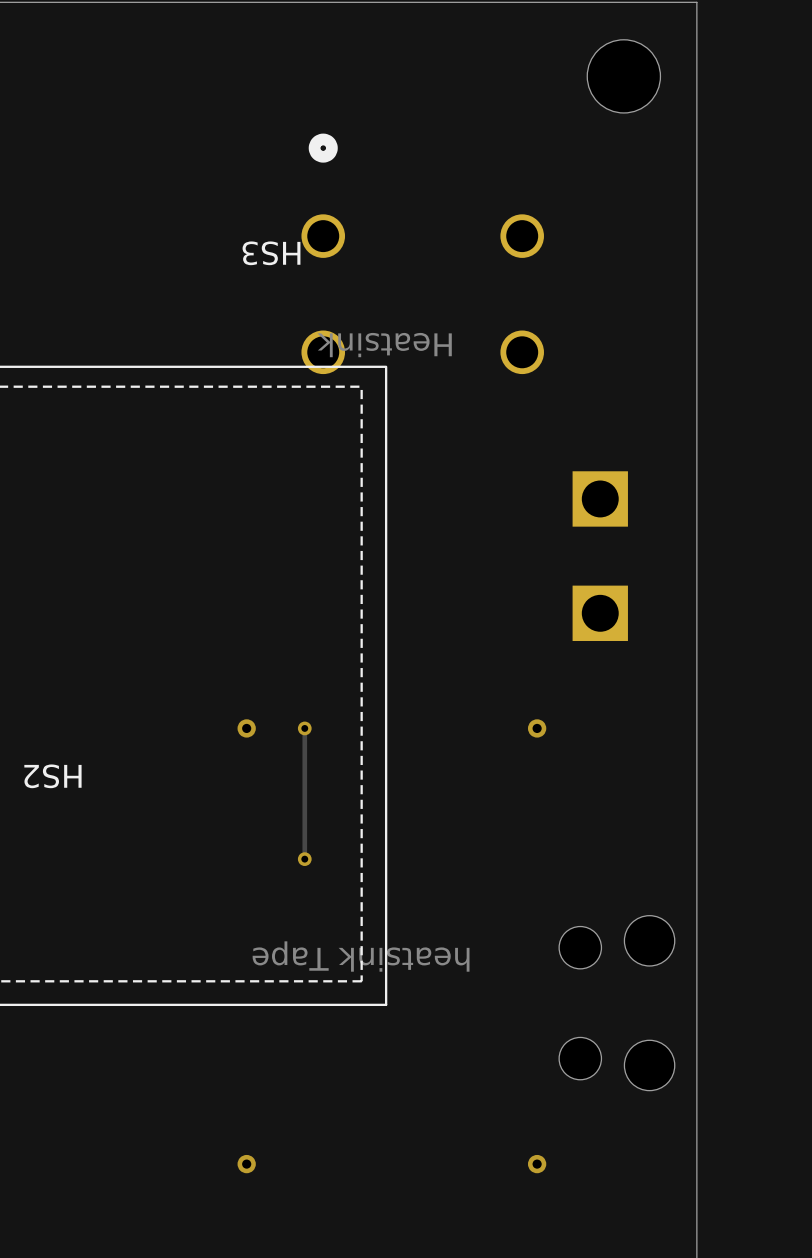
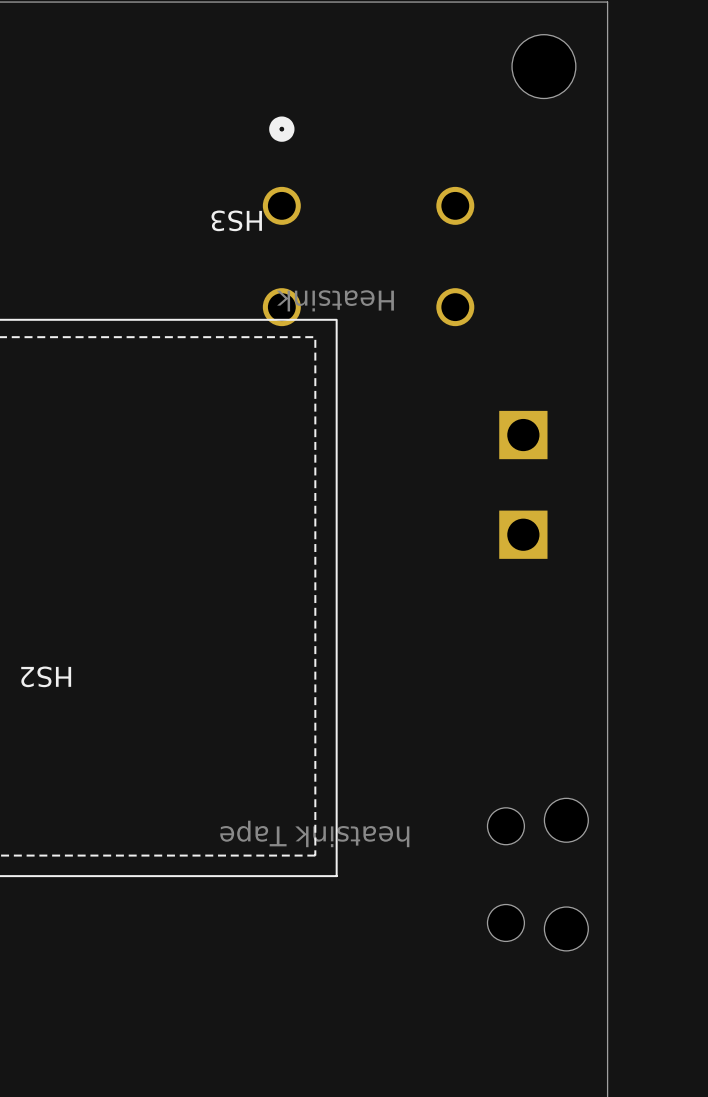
via: (246, 728) -> none
track: (304, 728) (304, 859) -> none
via: (304, 728) -> none
via: (537, 728) -> none
via: (304, 859) -> none
via: (246, 1164) -> none
via: (537, 1164) -> none

